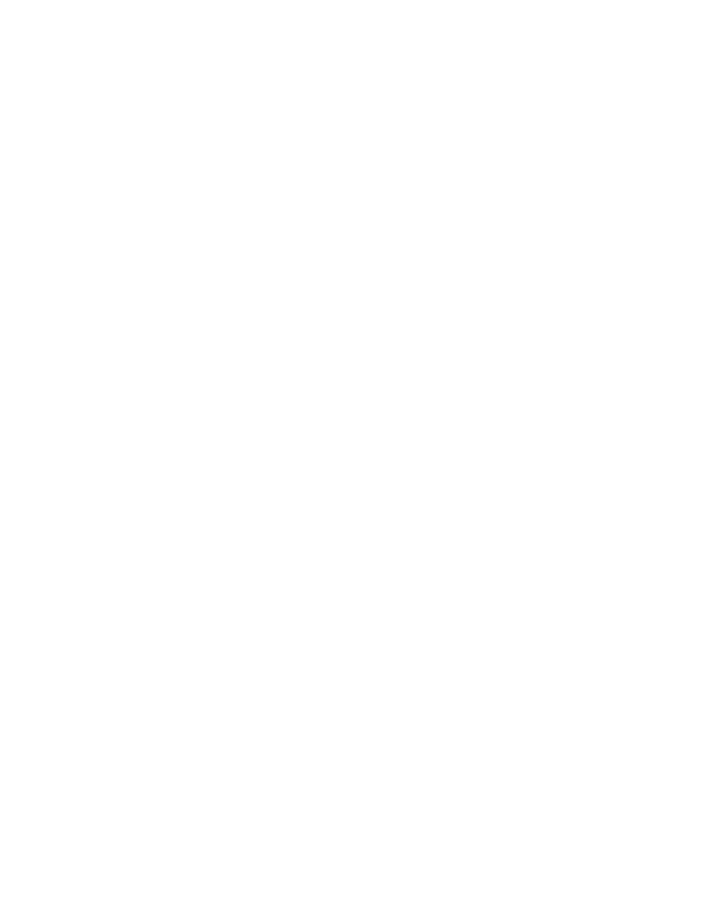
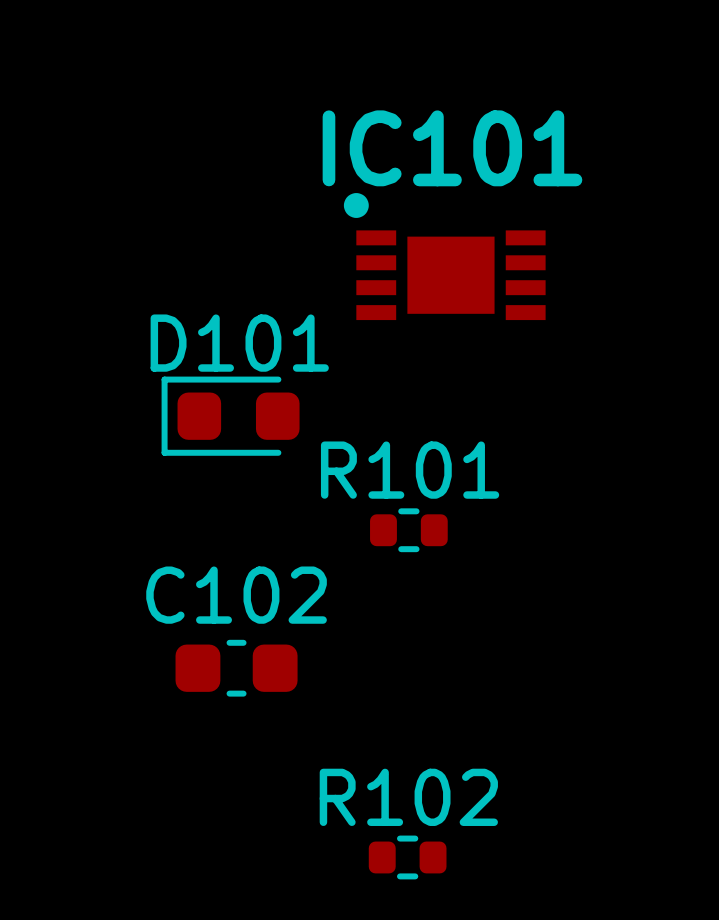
IC101: none -> (444, 256)
D101: none -> (230, 416)
R101: none -> (408, 530)
C102: none -> (236, 668)
R102: none -> (407, 857)

